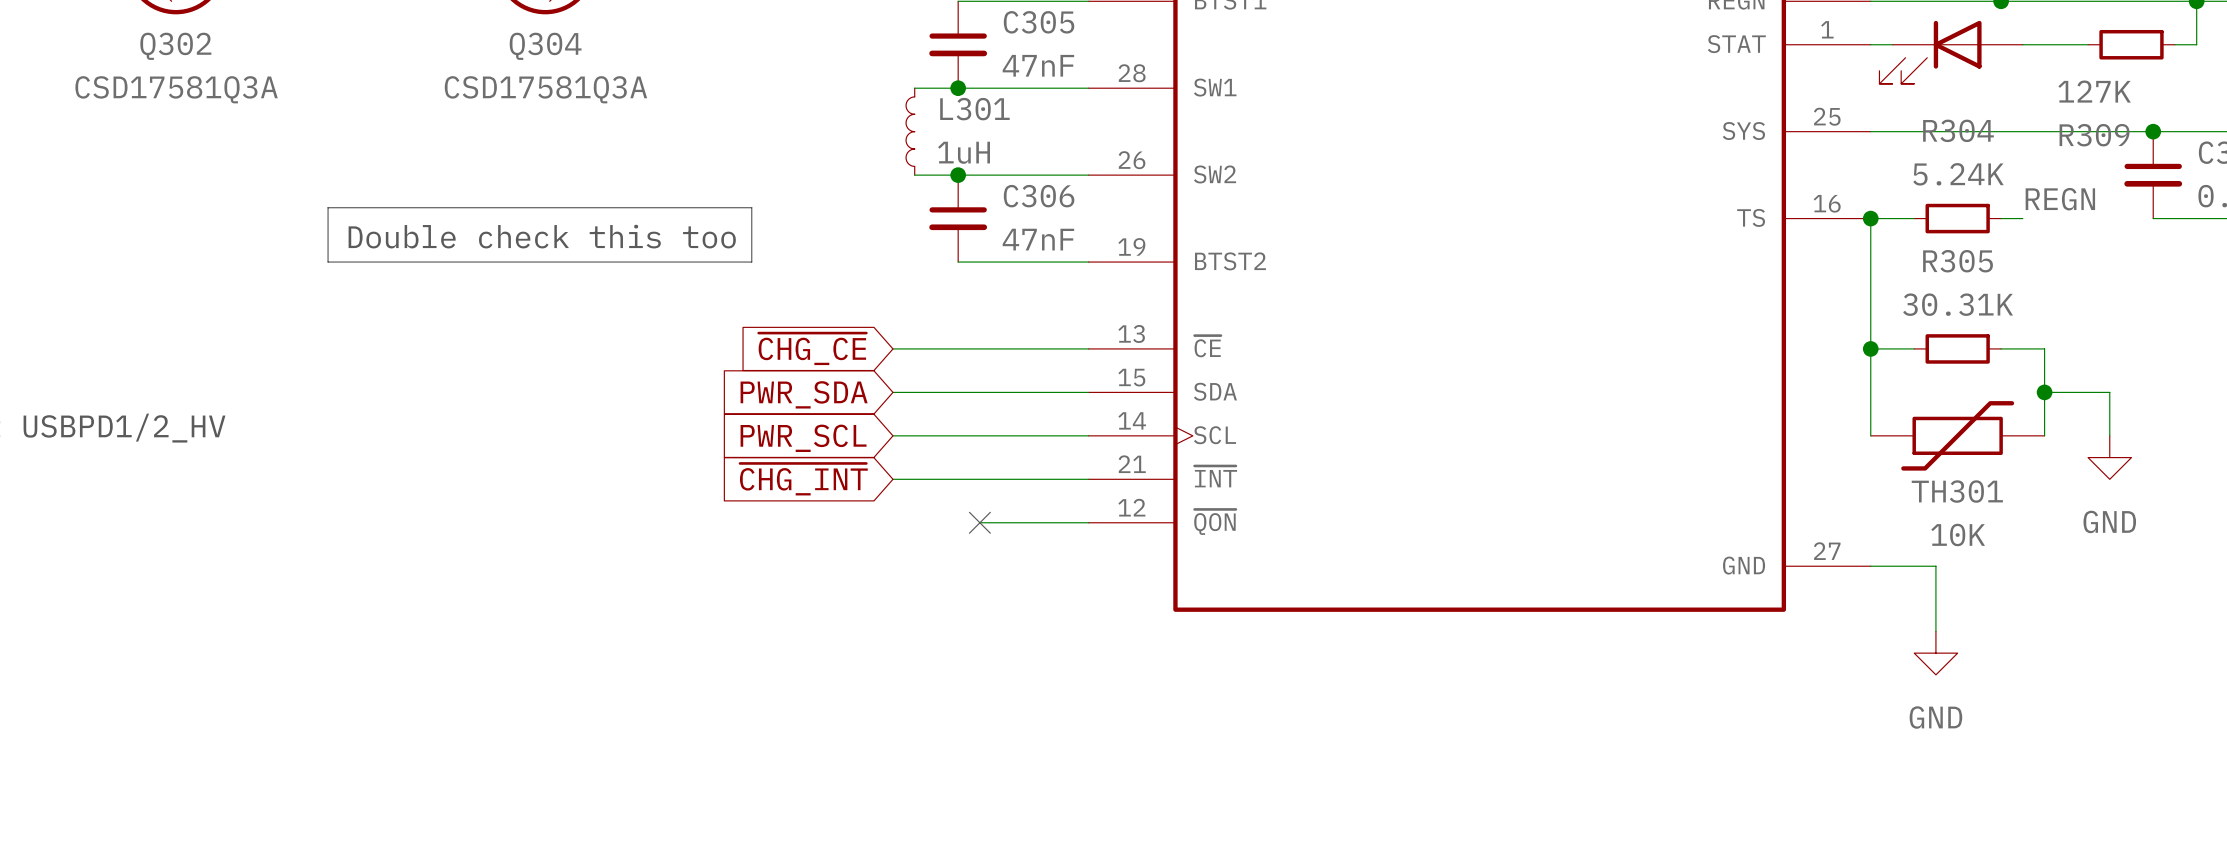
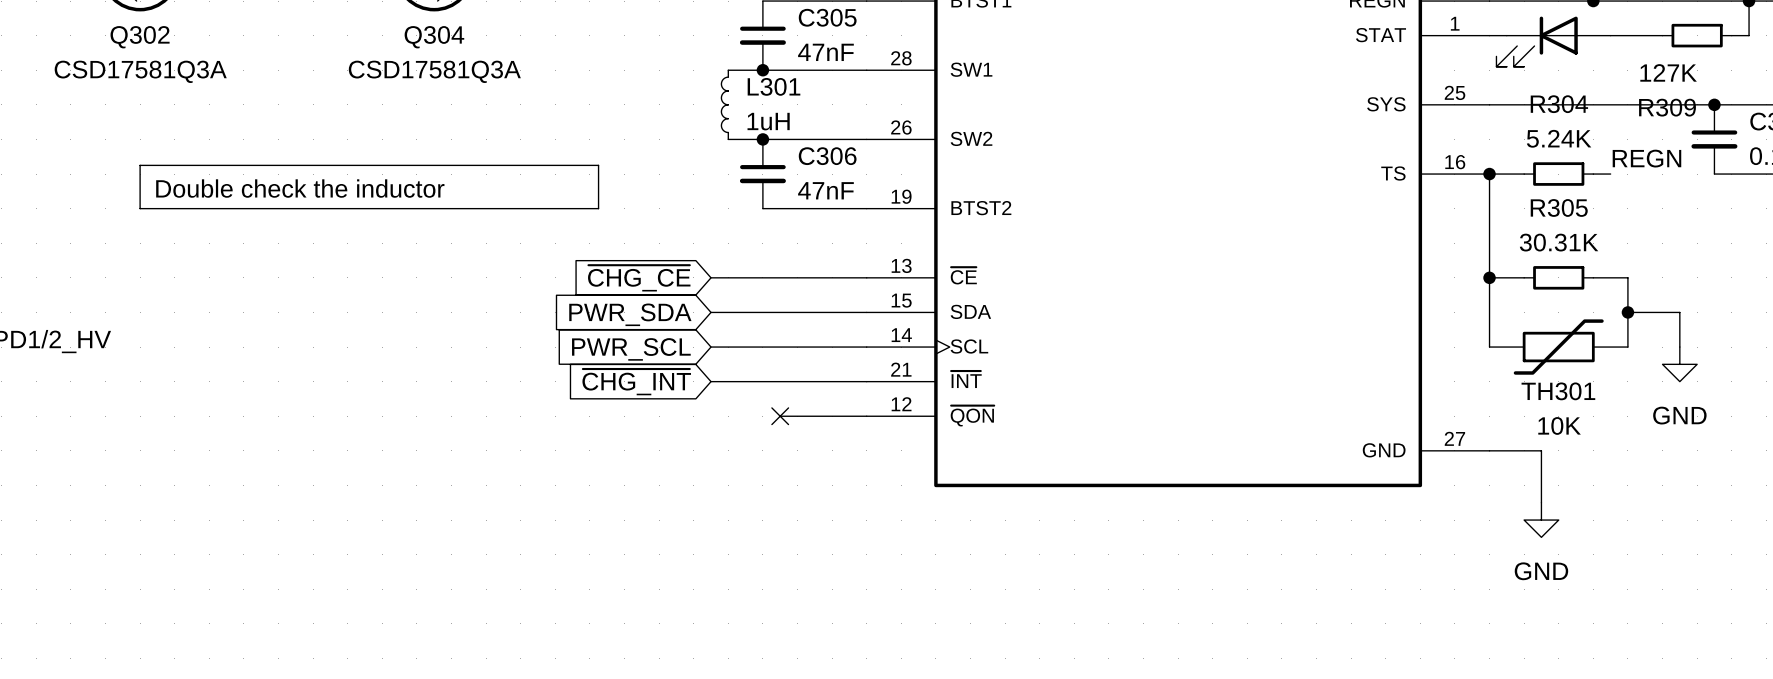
line: (328, 207) (328, 262) -> (261, 165) (140, 165) (140, 208) (261, 208)
text: Double check this too (542, 236) -> Double check the inductor (300, 188)

